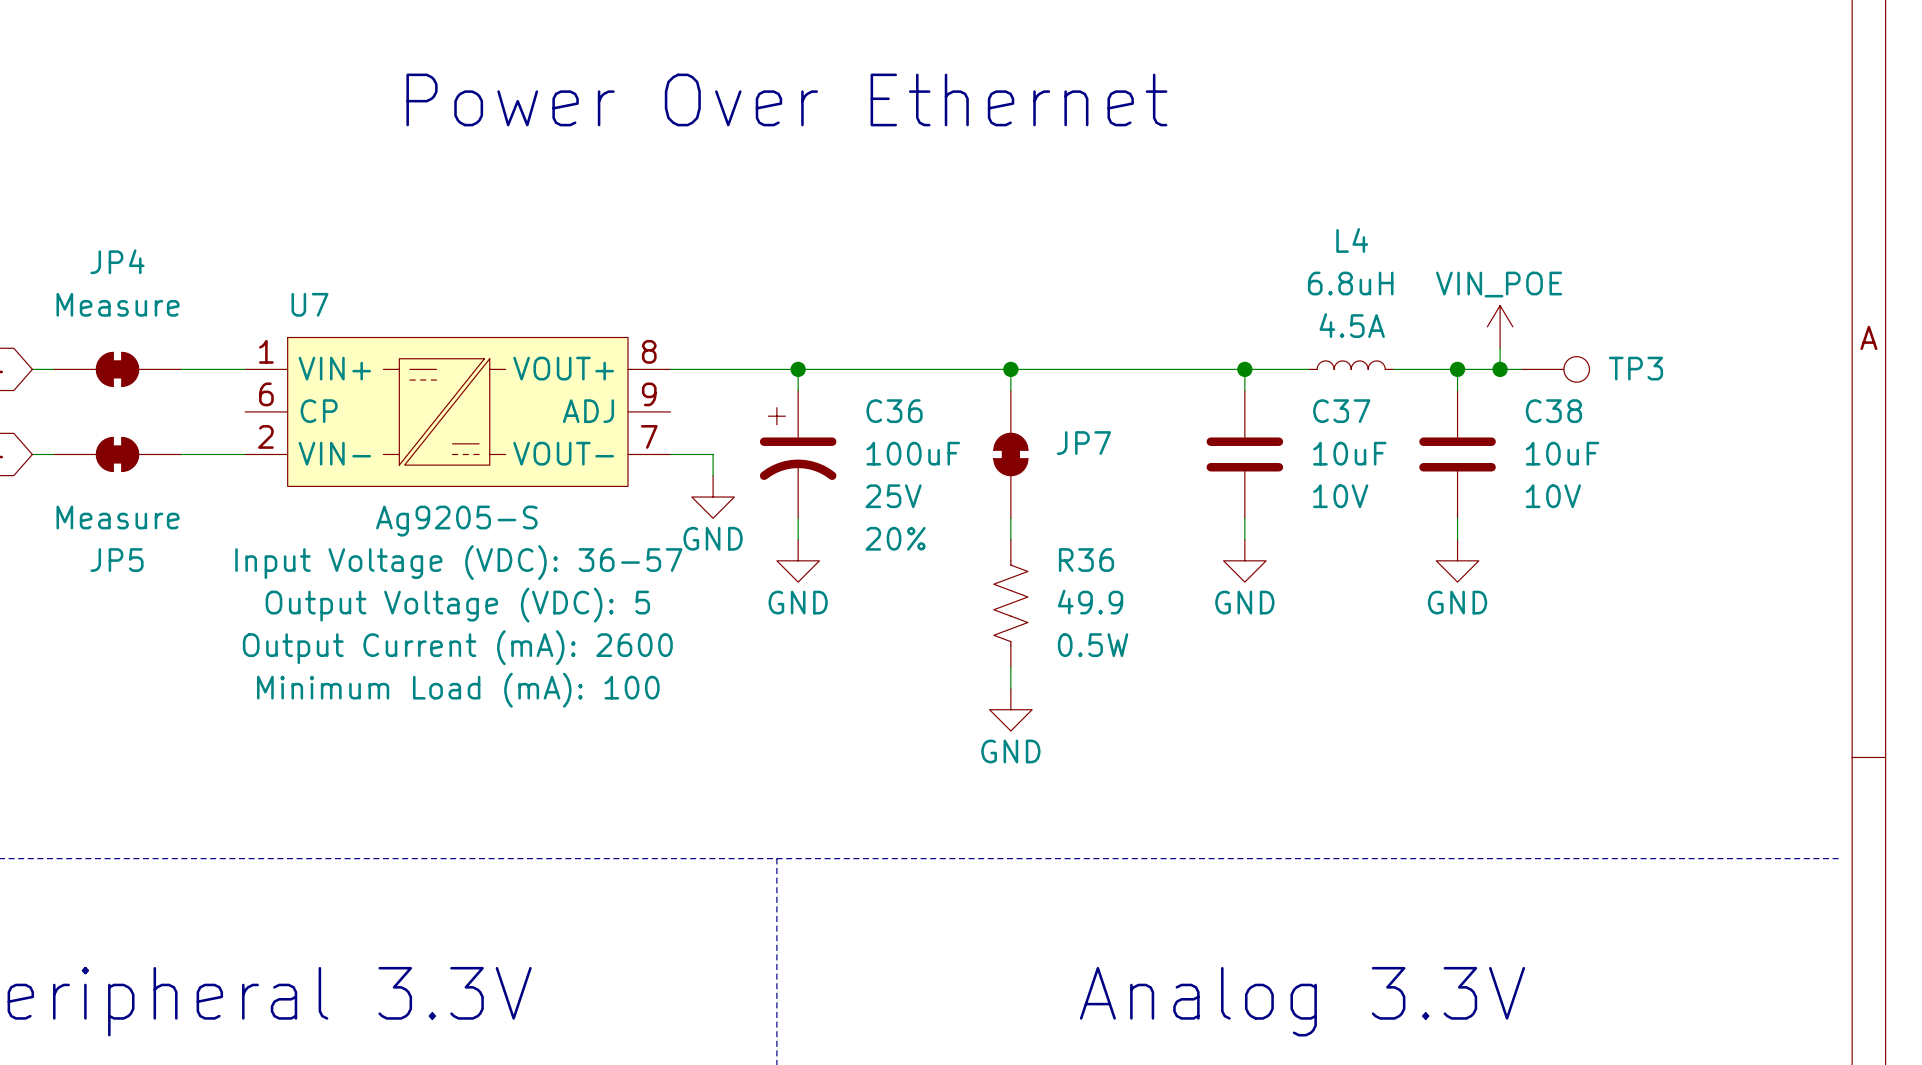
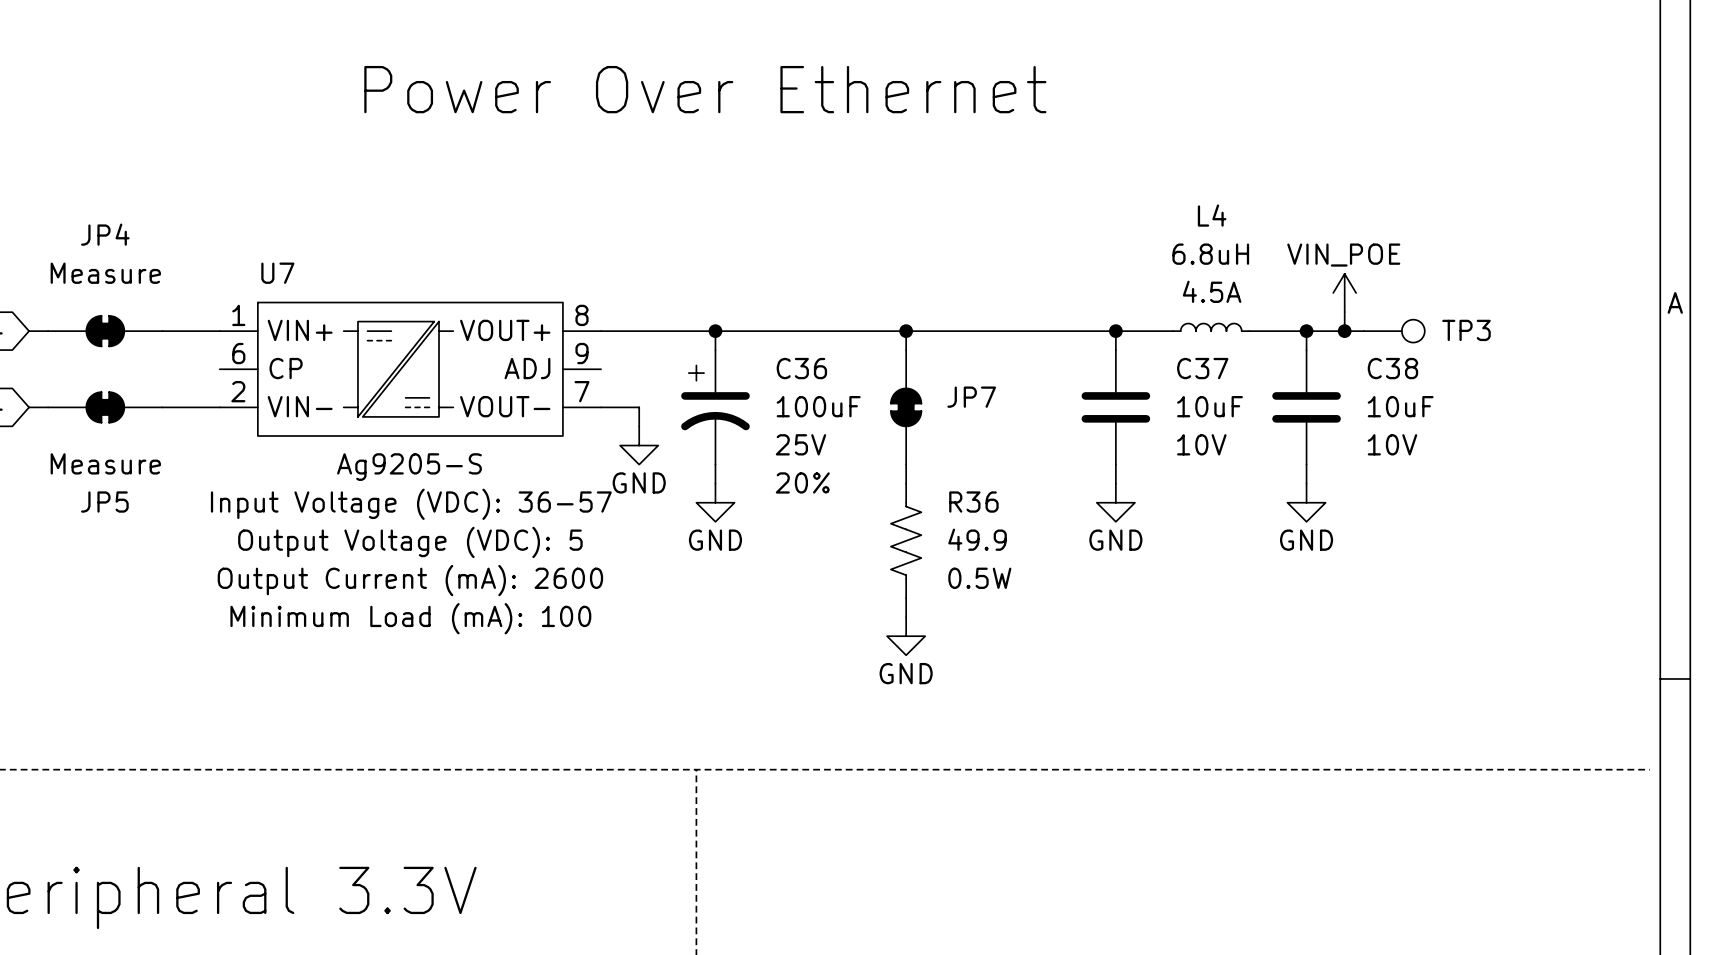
text: Analog 3.3V (1302, 1001) -> none

